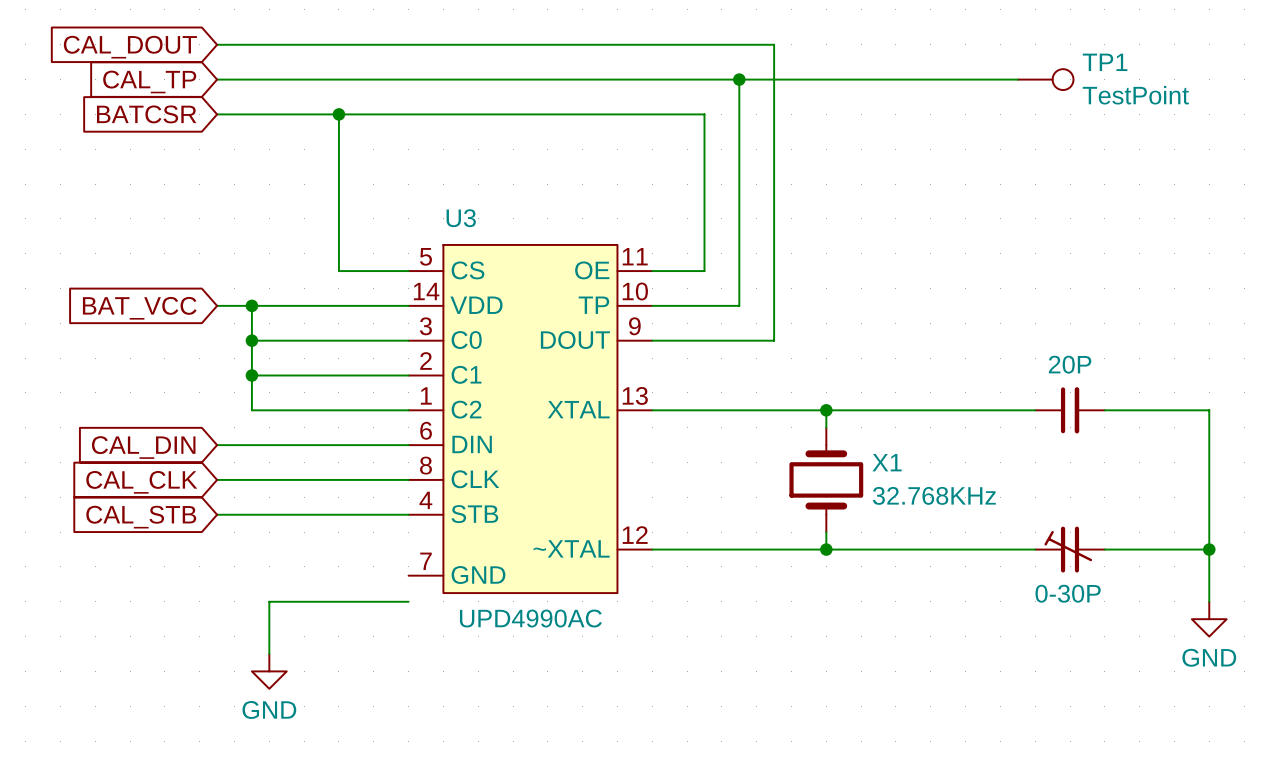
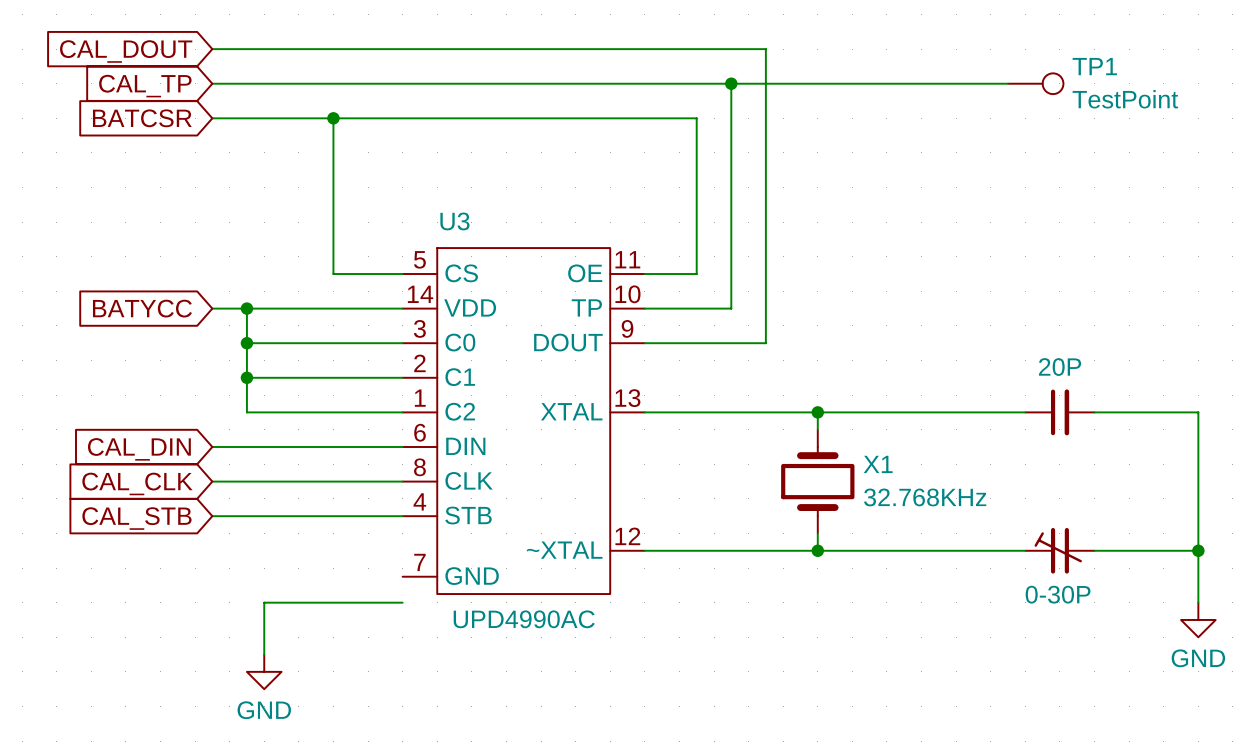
U3 symbol: [408, 244, 653, 594] -> [402, 248, 645, 595]
global label: BAT_VCC (139, 308) -> BATYCC (142, 308)

